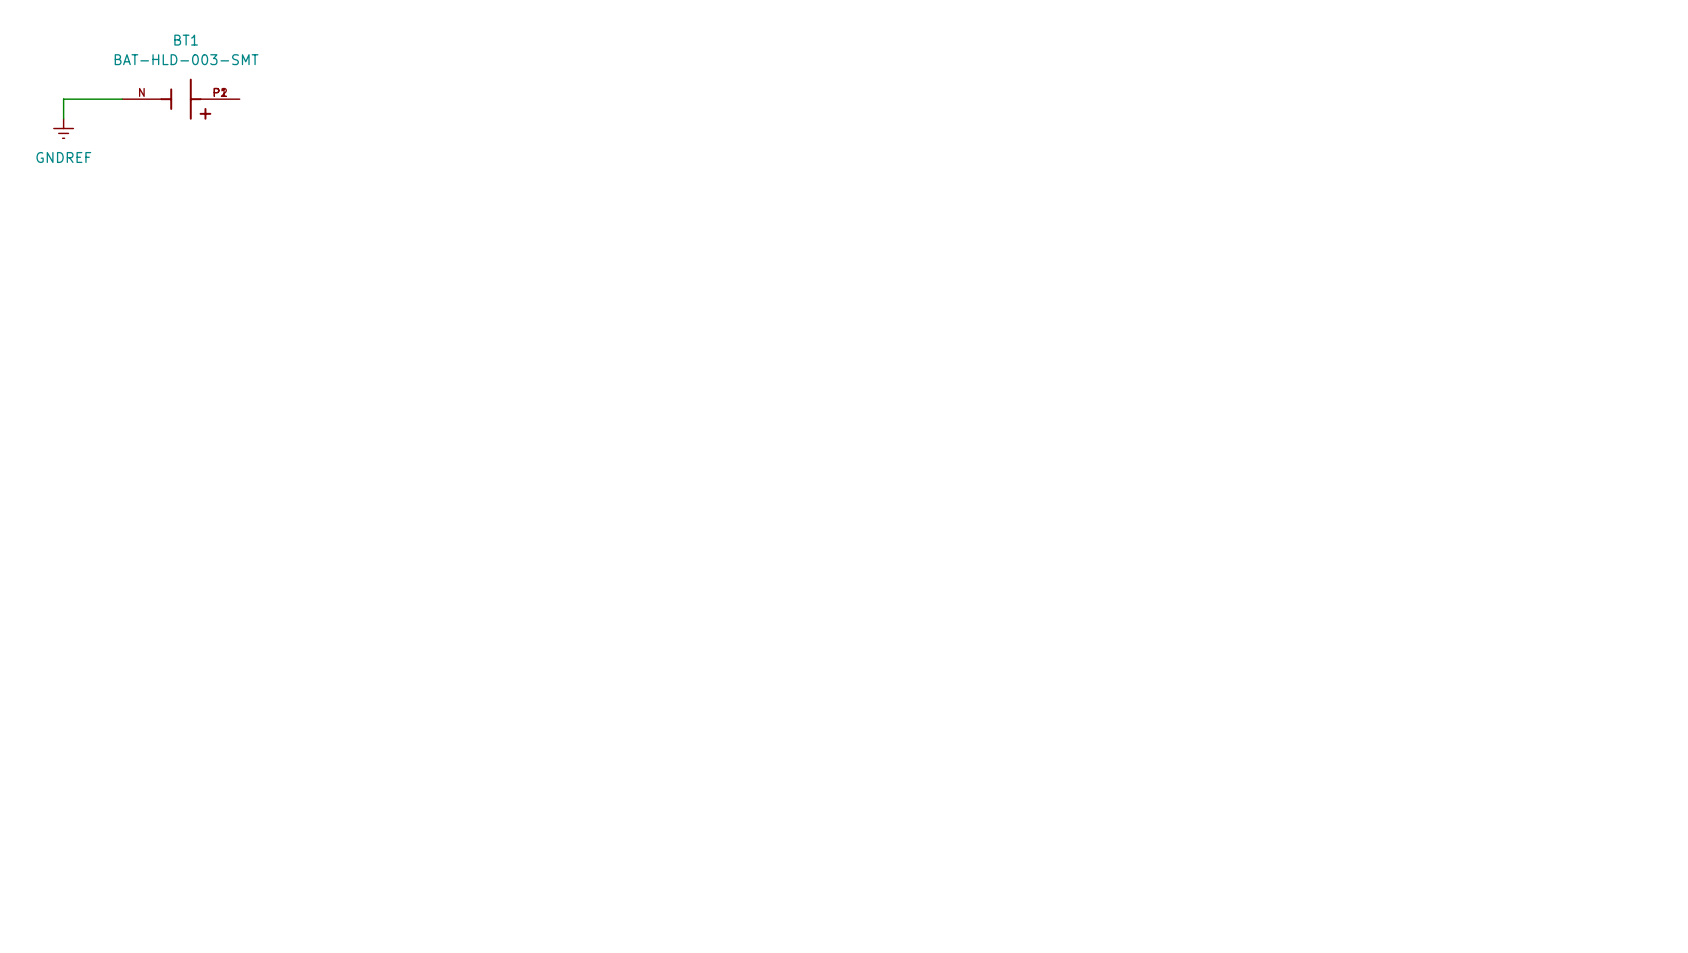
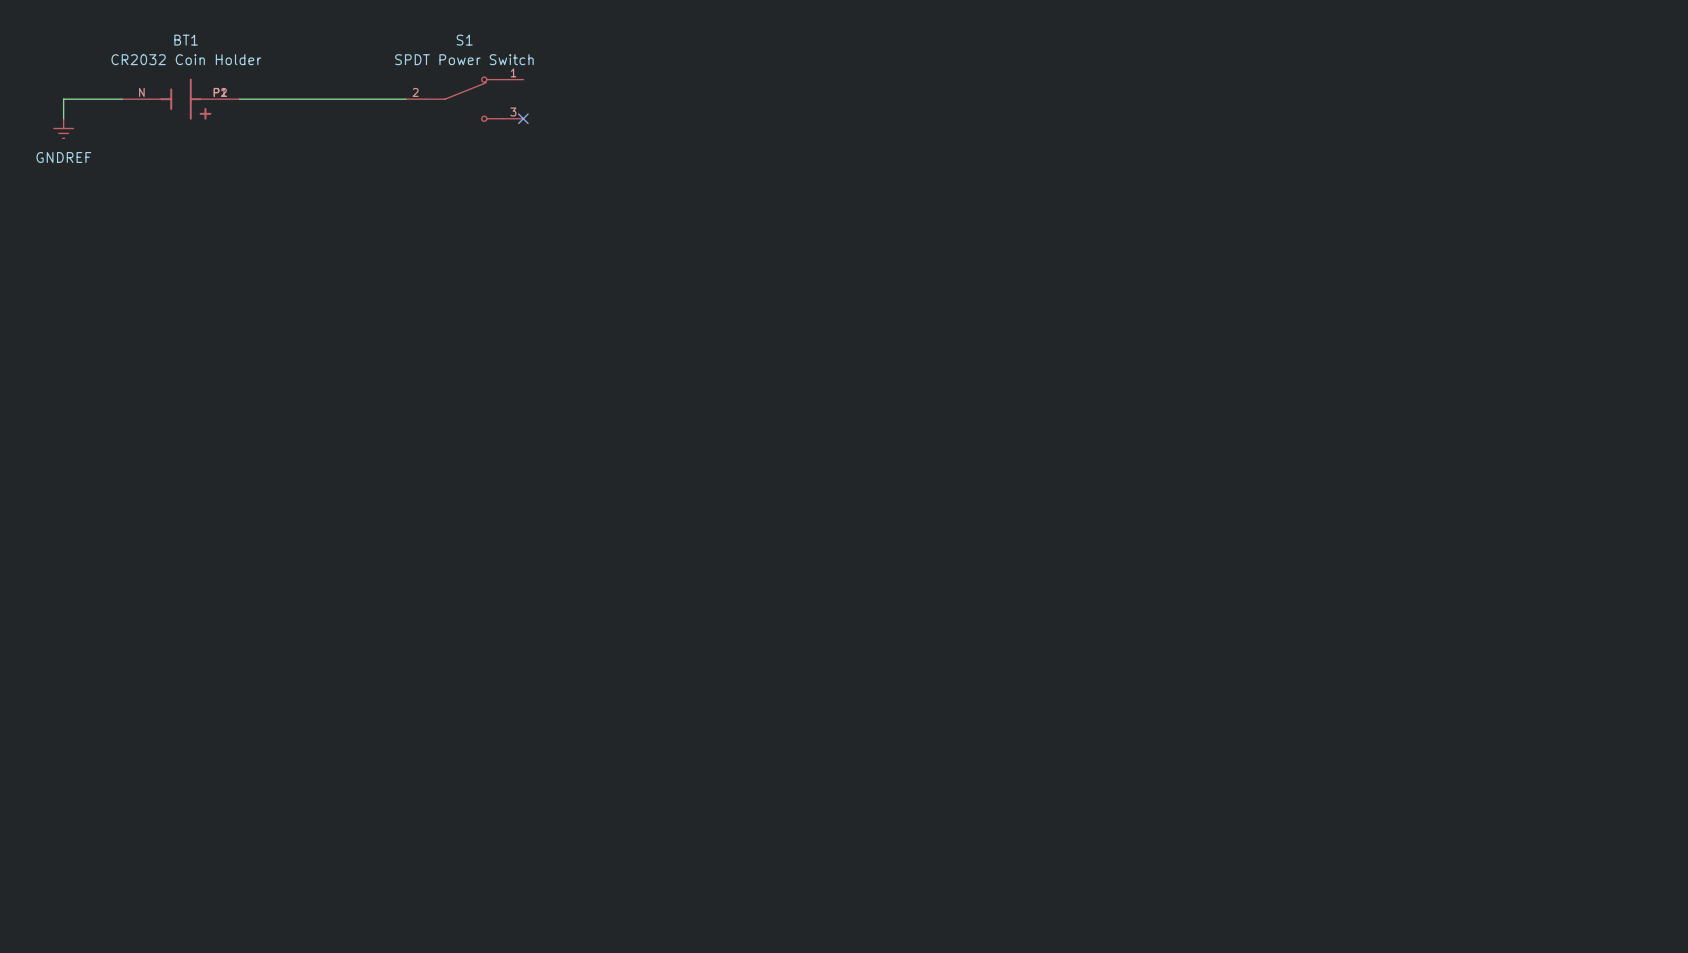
BT1 value: BAT-HLD-003-SMT (186, 59) -> CR2032 Coin Holder (186, 59)
wire: none -> (239, 99) (405, 99)
S1: none -> SPDT Power Switch (464, 99)
no-connect mark: none -> (523, 118)

